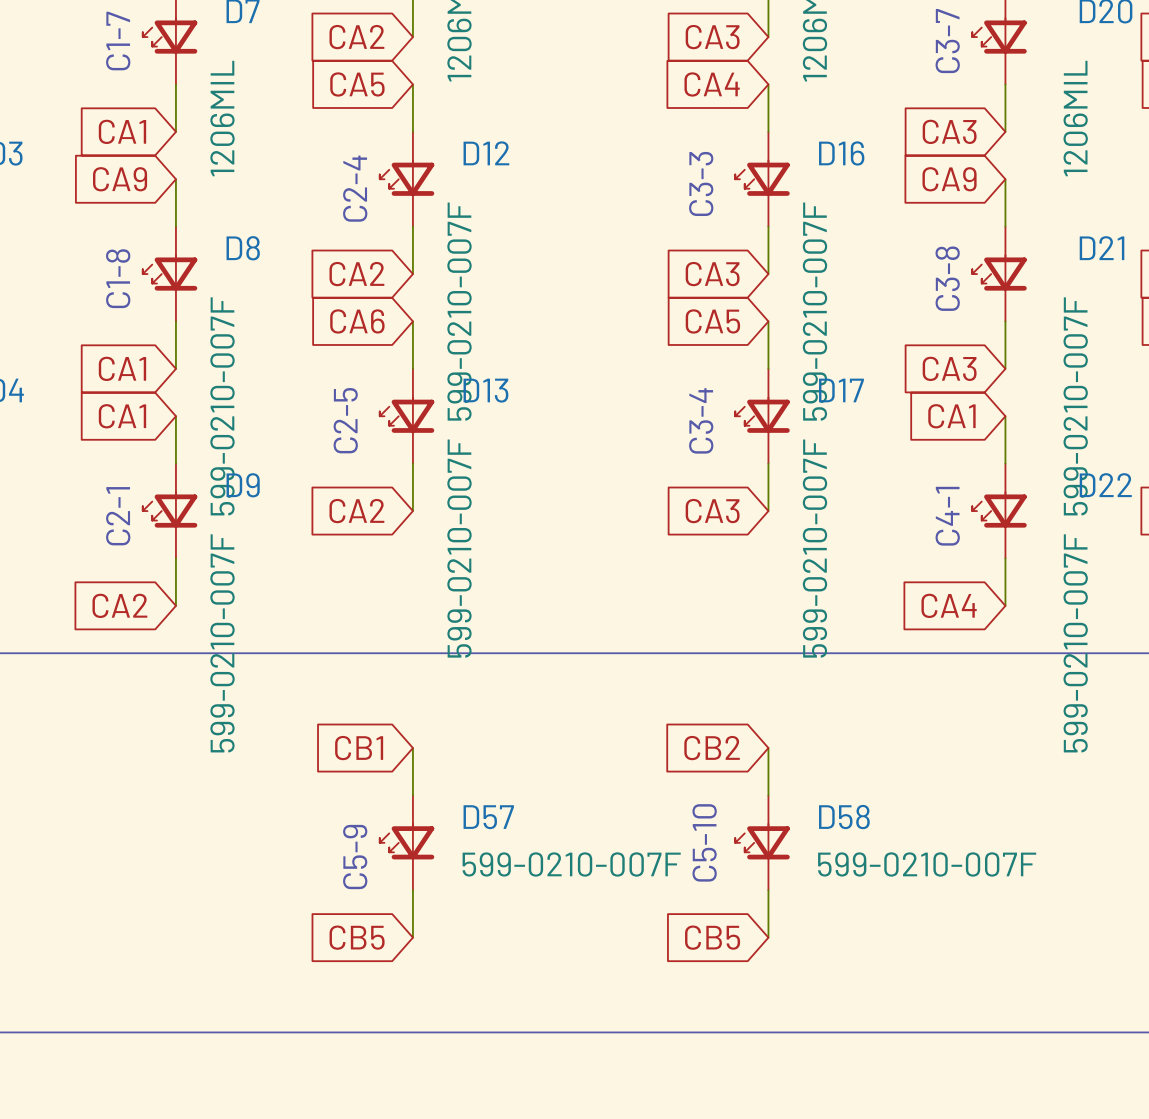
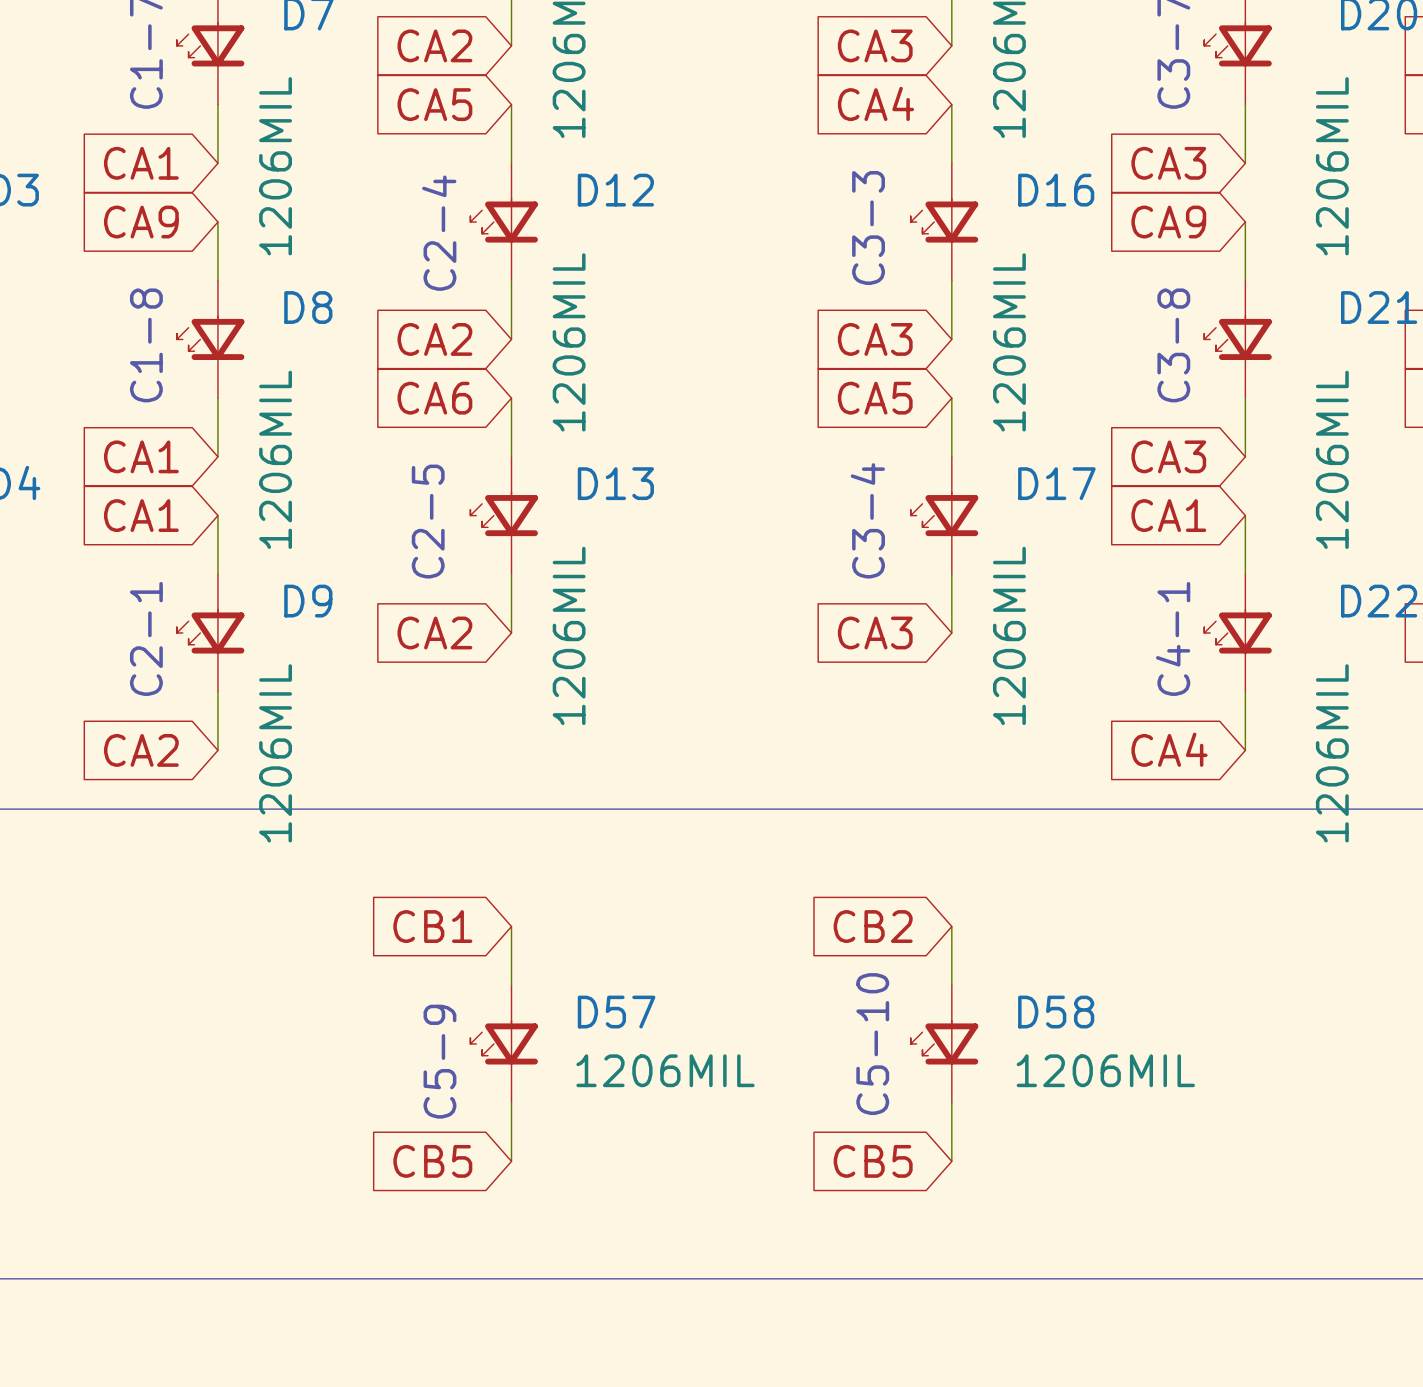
D12 value: 599-0210-007F (459, 311) -> 1206MIL (569, 342)
D16 value: 599-0210-007F (814, 311) -> 1206MIL (1009, 342)
D8 value: 599-0210-007F (222, 406) -> 1206MIL (275, 459)
D21 value: 599-0210-007F (1075, 406) -> 1206MIL (1332, 459)
D13 value: 599-0210-007F (459, 548) -> 1206MIL (569, 635)
D17 value: 599-0210-007F (814, 548) -> 1206MIL (1009, 635)
D9 value: 599-0210-007F (222, 643) -> 1206MIL (275, 753)
D22 value: 599-0210-007F (1075, 643) -> 1206MIL (1332, 753)
D57 value: 599-0210-007F (571, 864) -> 1206MIL (665, 1070)
D58 value: 599-0210-007F (927, 864) -> 1206MIL (1105, 1070)

